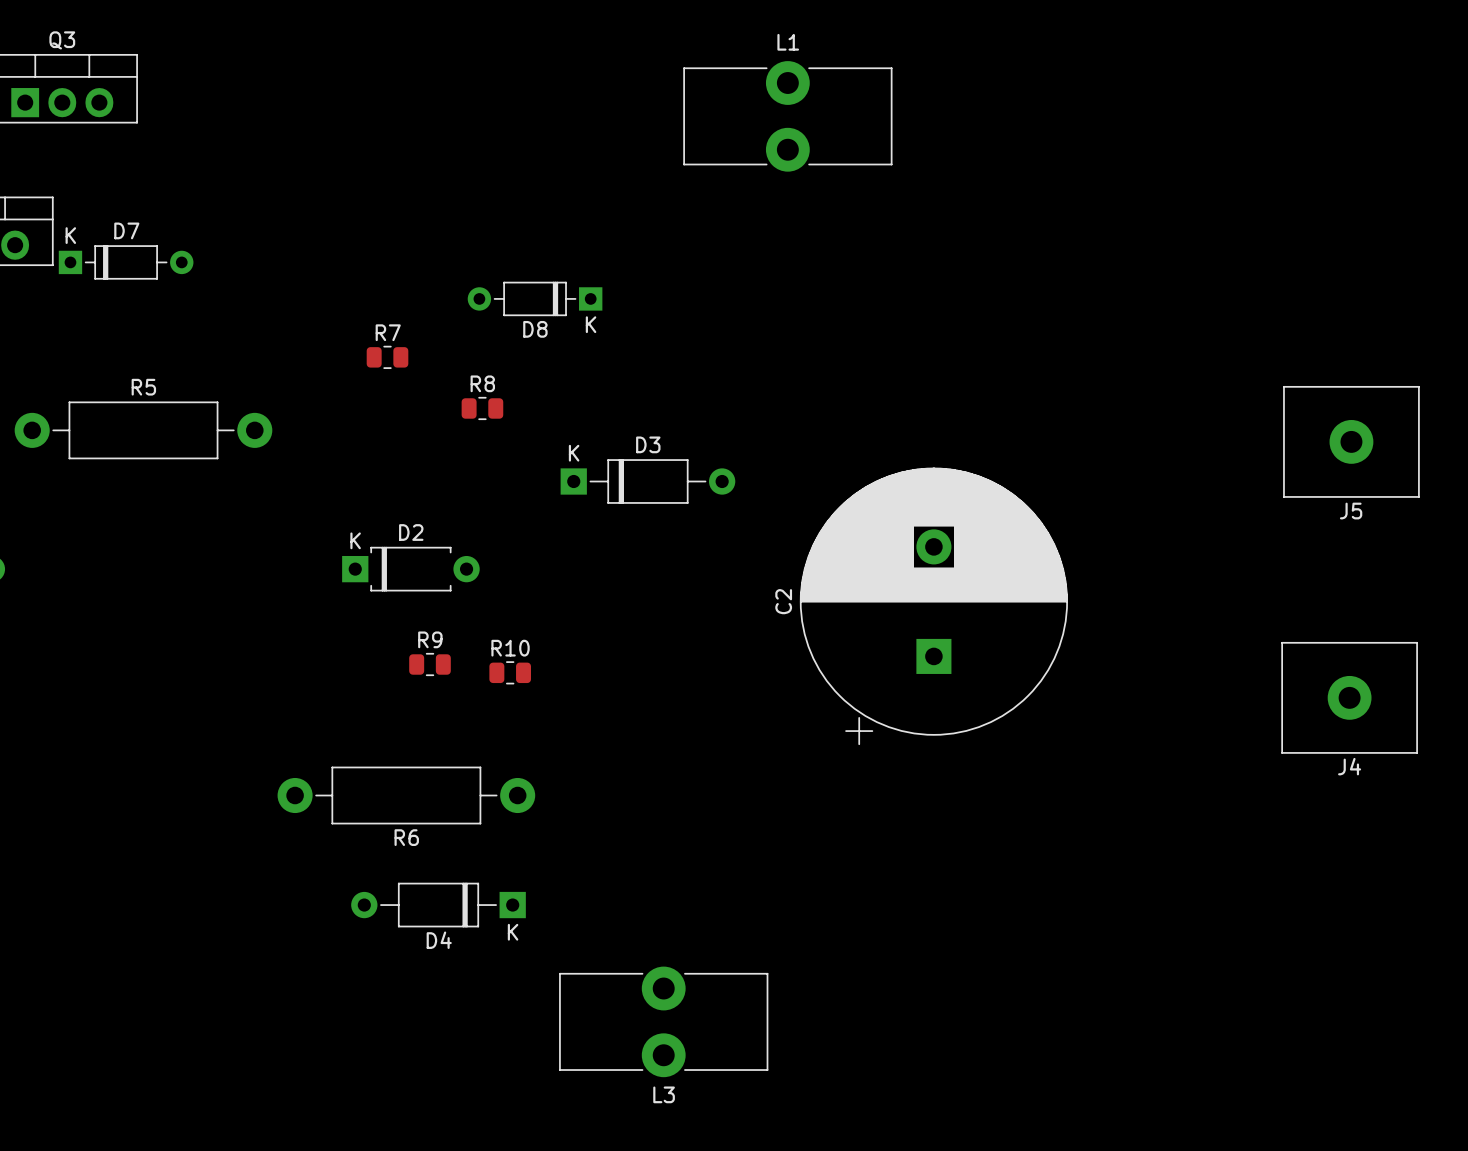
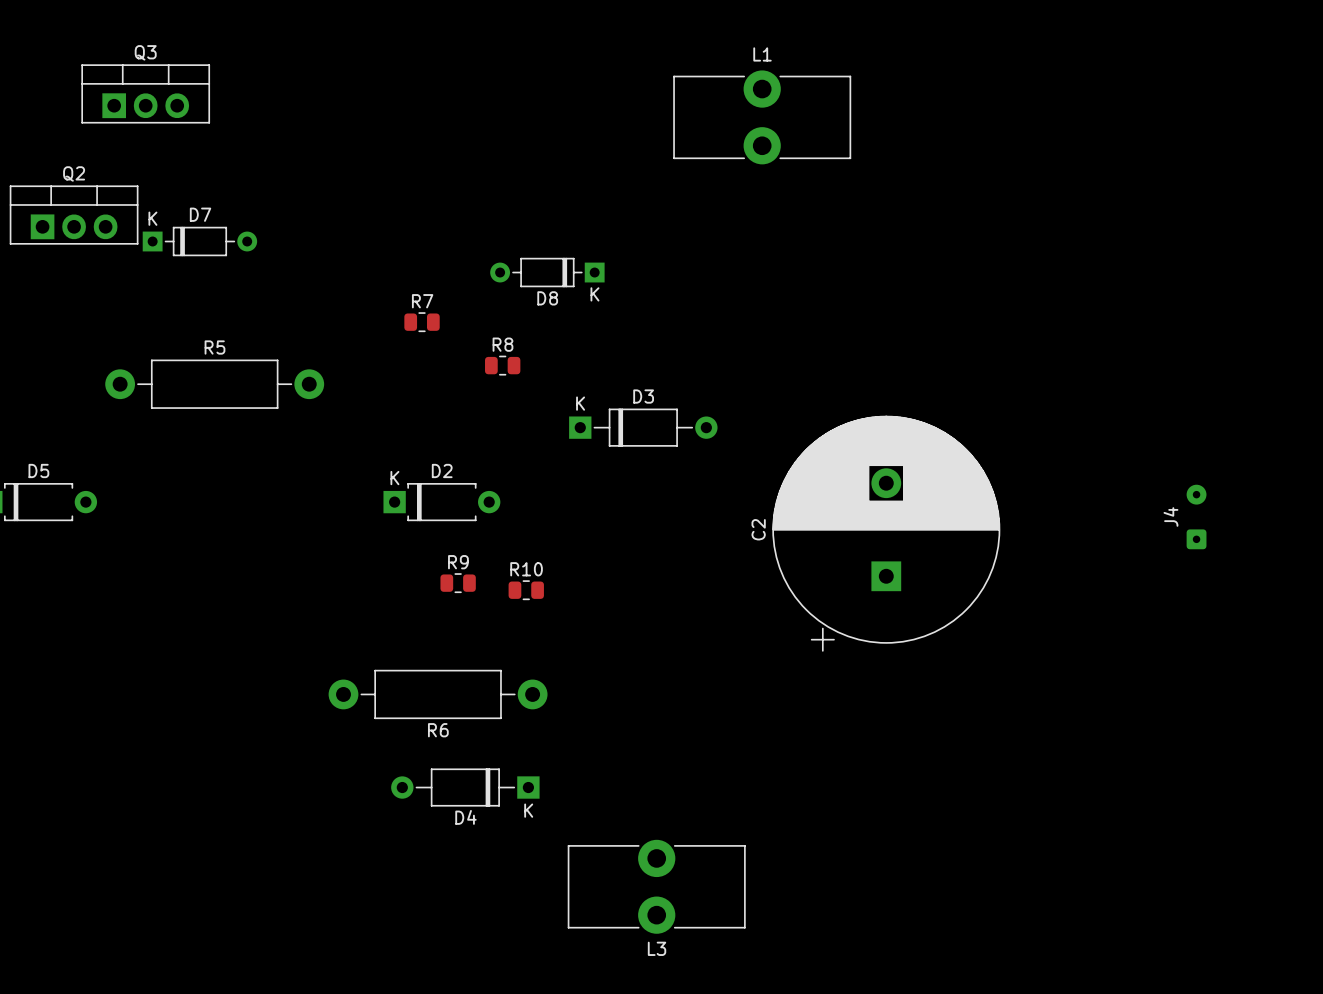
J5: (1351, 441) -> none
J4 footprint: [1281, 641, 1418, 754] -> [1186, 484, 1207, 550]
J4 name position: J4 (1349, 766) -> J4 (1170, 516)

